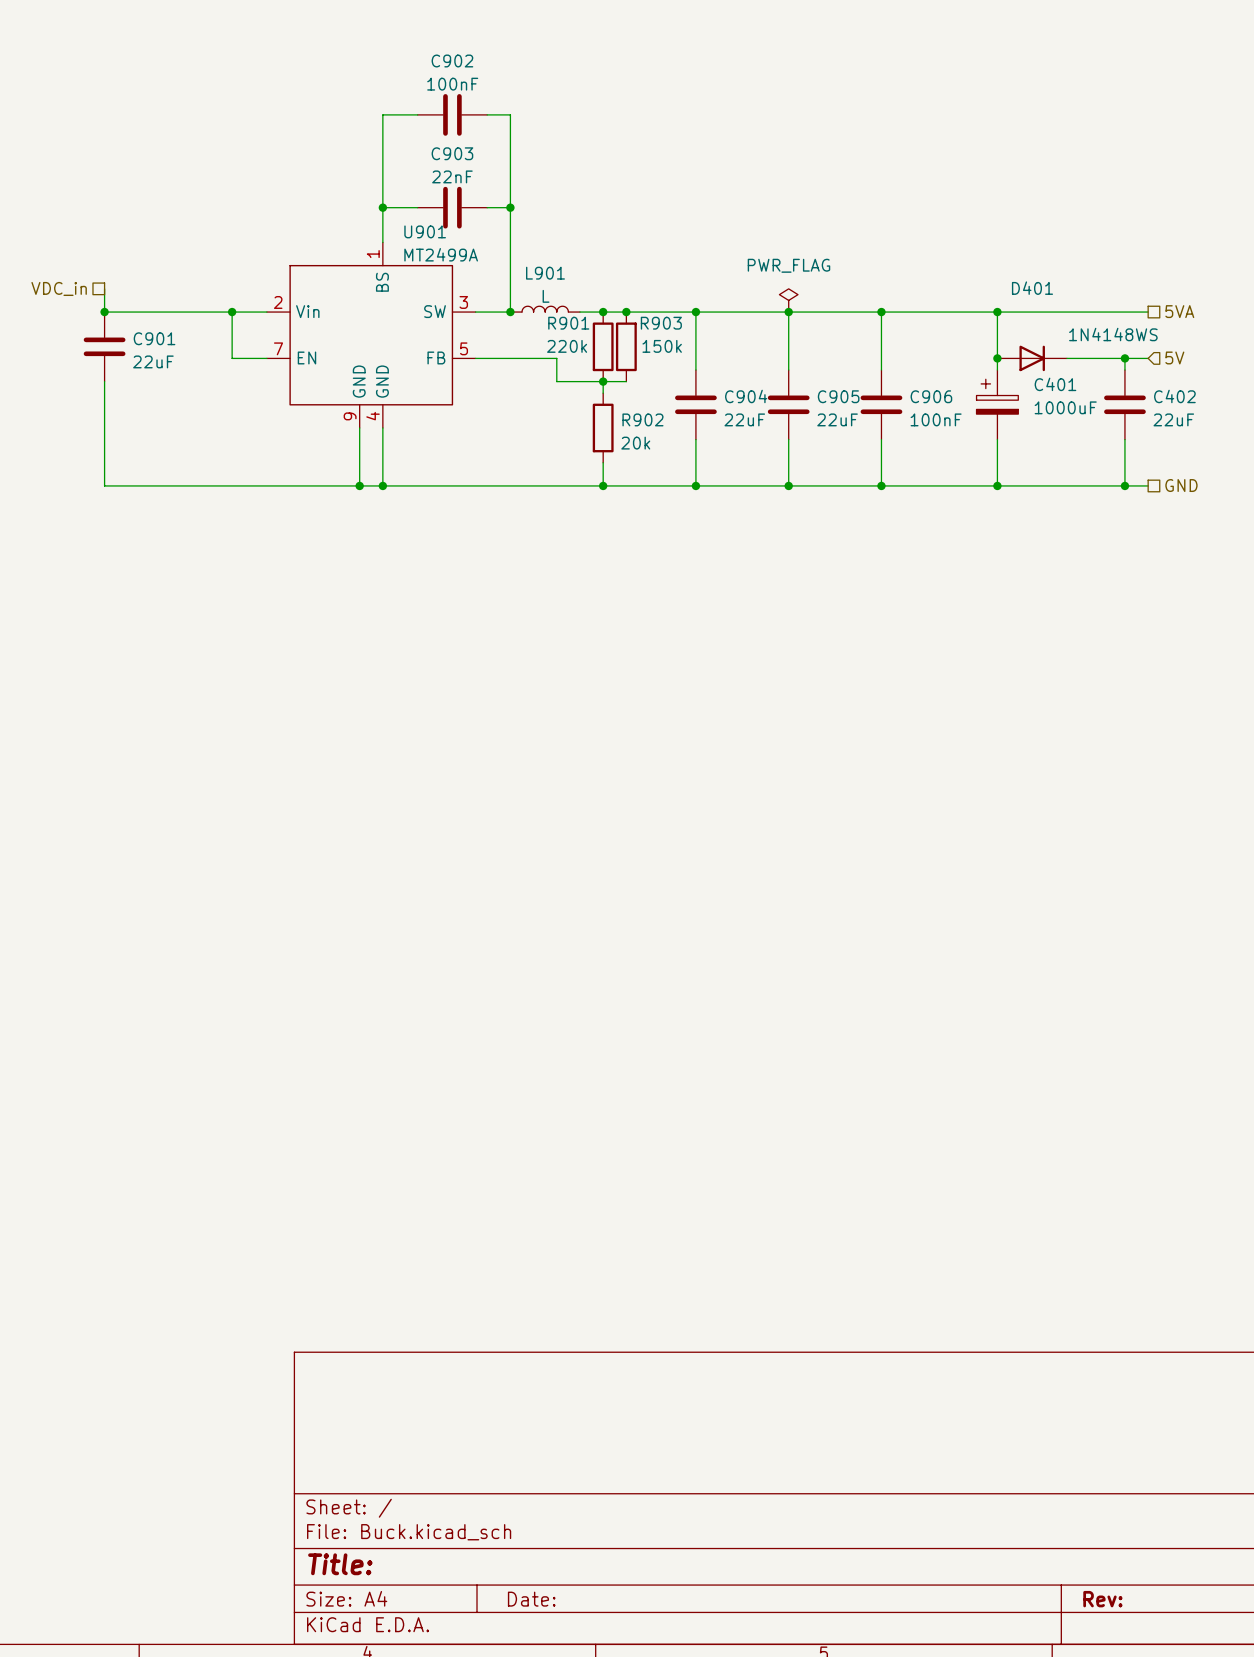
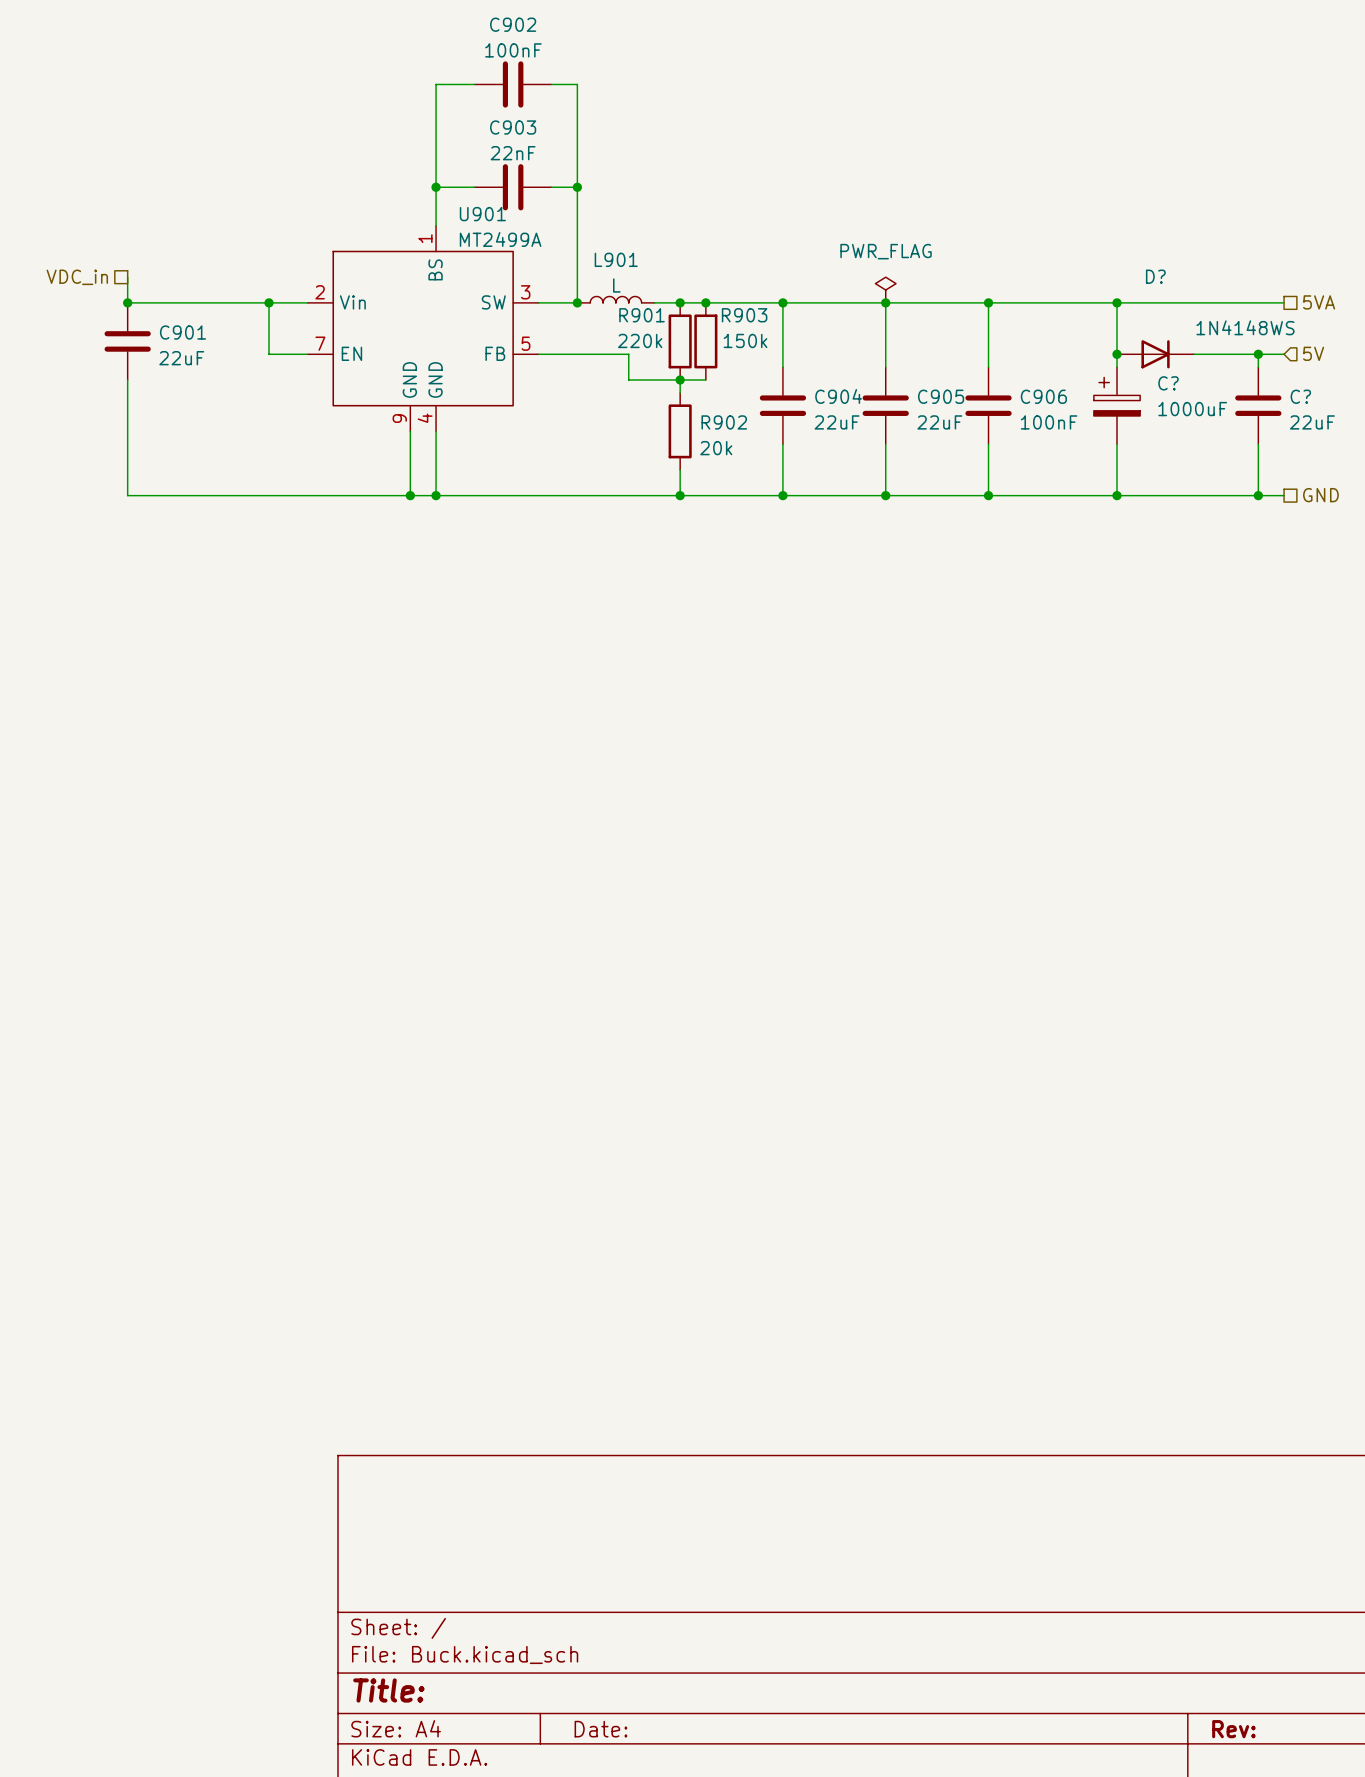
D401 name: D401 (1032, 288) -> D? (1155, 276)
C401 name: C401 (1055, 384) -> C? (1168, 383)
C402 name: C402 (1174, 396) -> C? (1300, 396)

